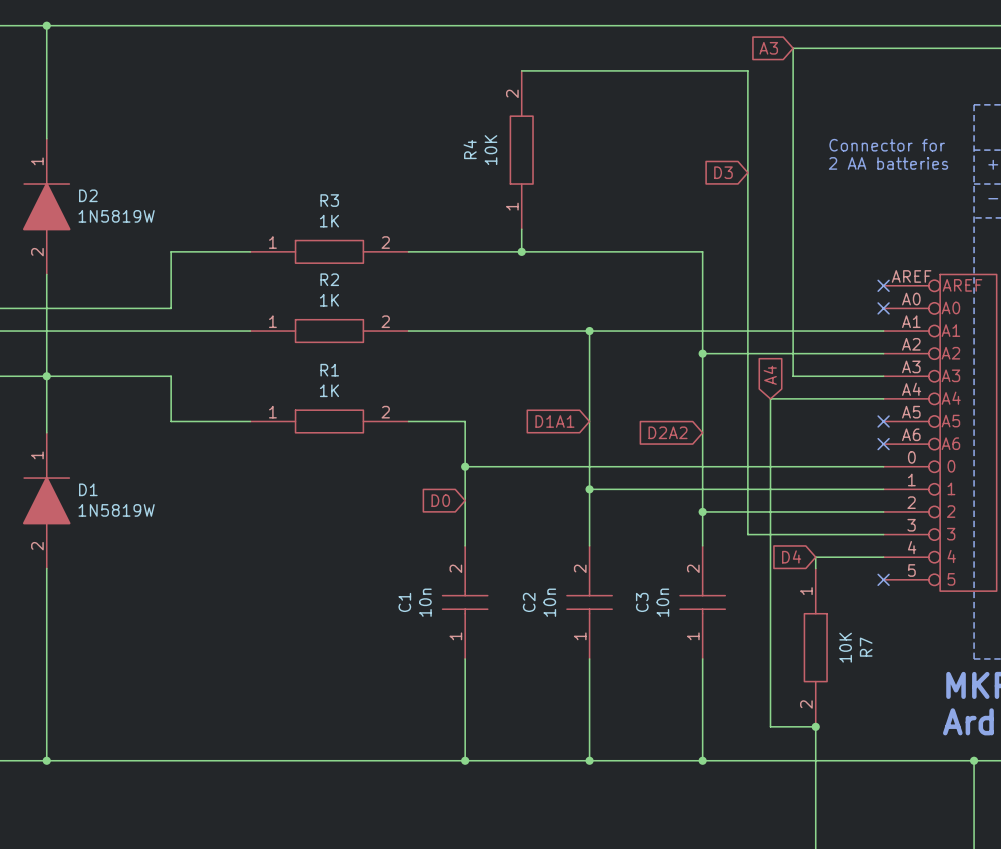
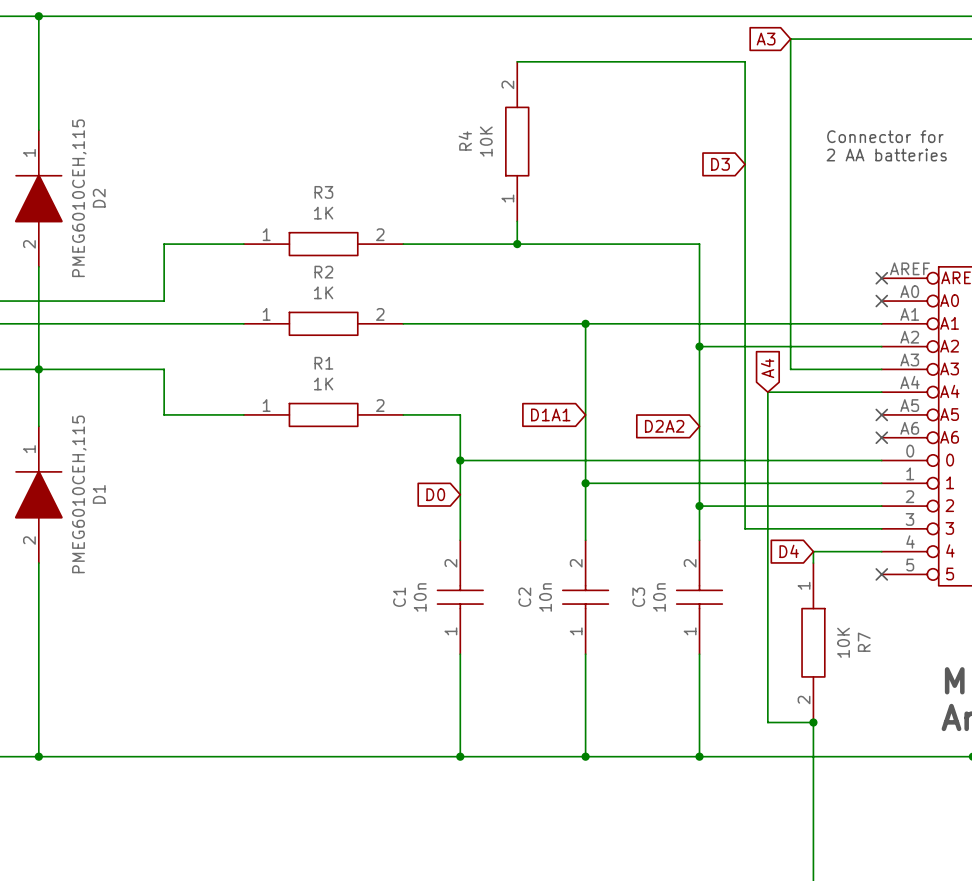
D2 name rotation: 0° (88, 195) -> 90° counterclockwise (99, 198)
D2 value: 1N5819W (116, 216) -> PMEG6010CEH,115 (79, 198)
D1 name rotation: 0° (88, 489) -> 90° counterclockwise (99, 494)
D1 value: 1N5819W (116, 510) -> PMEG6010CEH,115 (79, 494)

